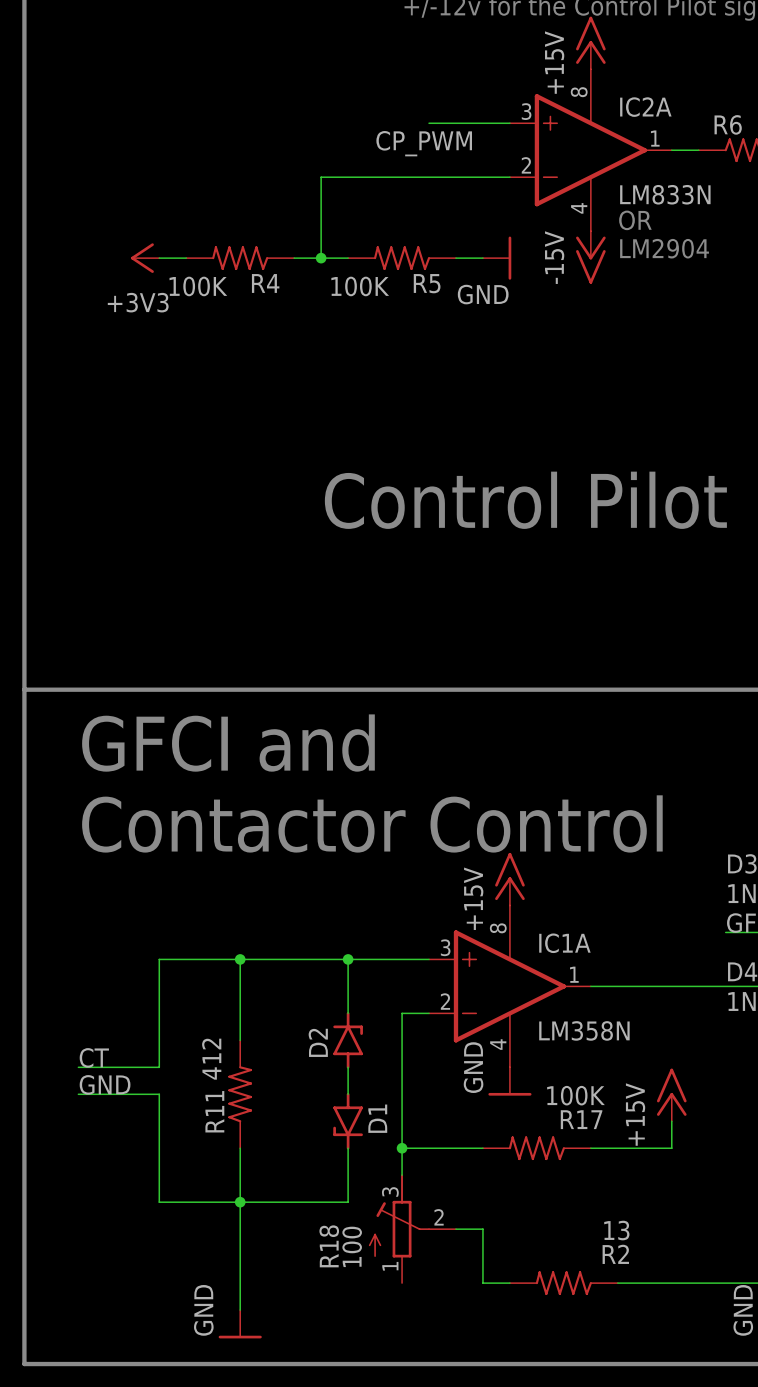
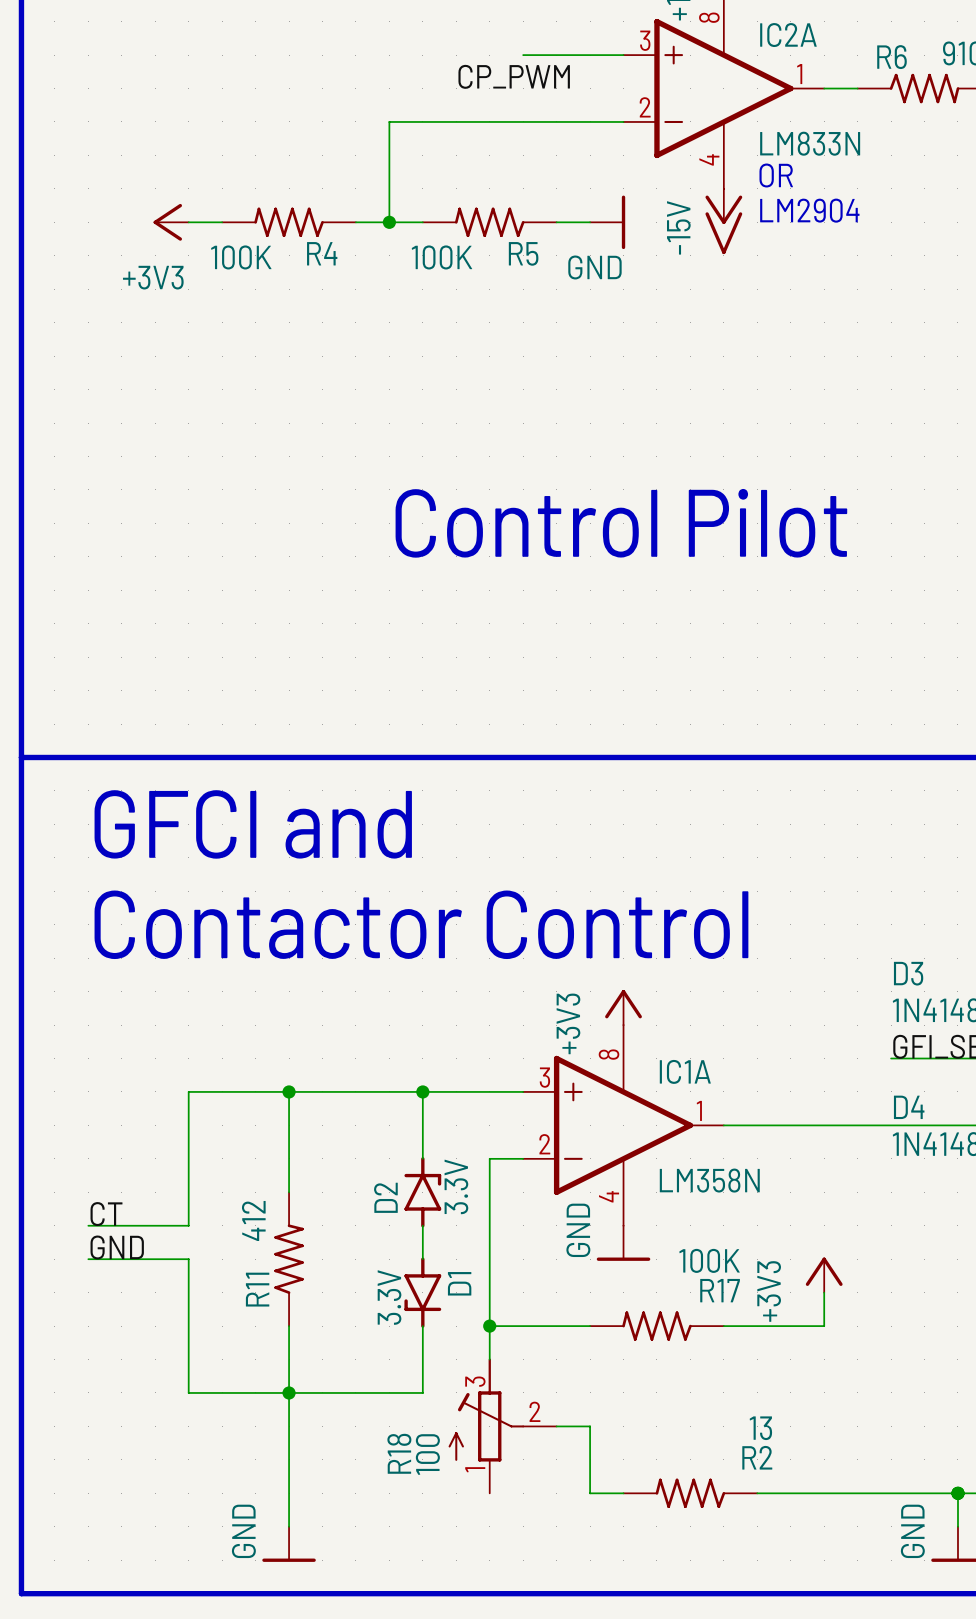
power symbol: +15V (509, 879) -> none
power symbol: none -> +3V3 (623, 1007)
D2 value: none -> 3.3V (456, 1186)
power symbol: +15V (671, 1094) -> none
power symbol: none -> +3V3 (824, 1275)
D1 value: none -> 3.3V (389, 1297)

